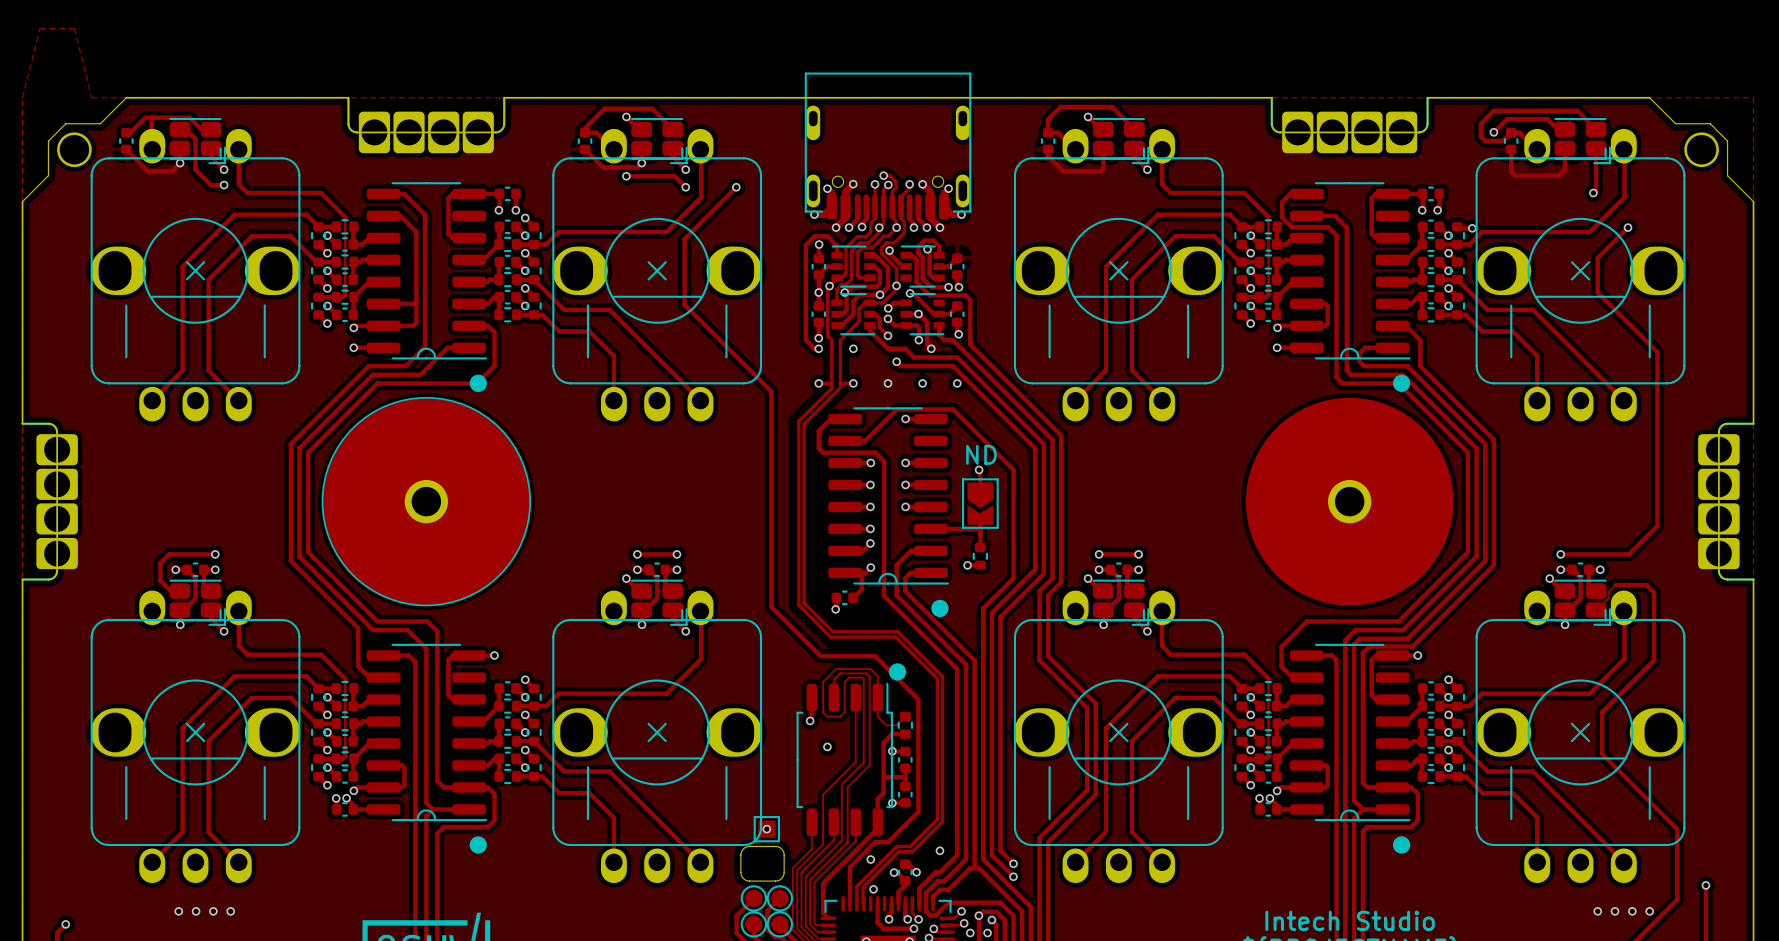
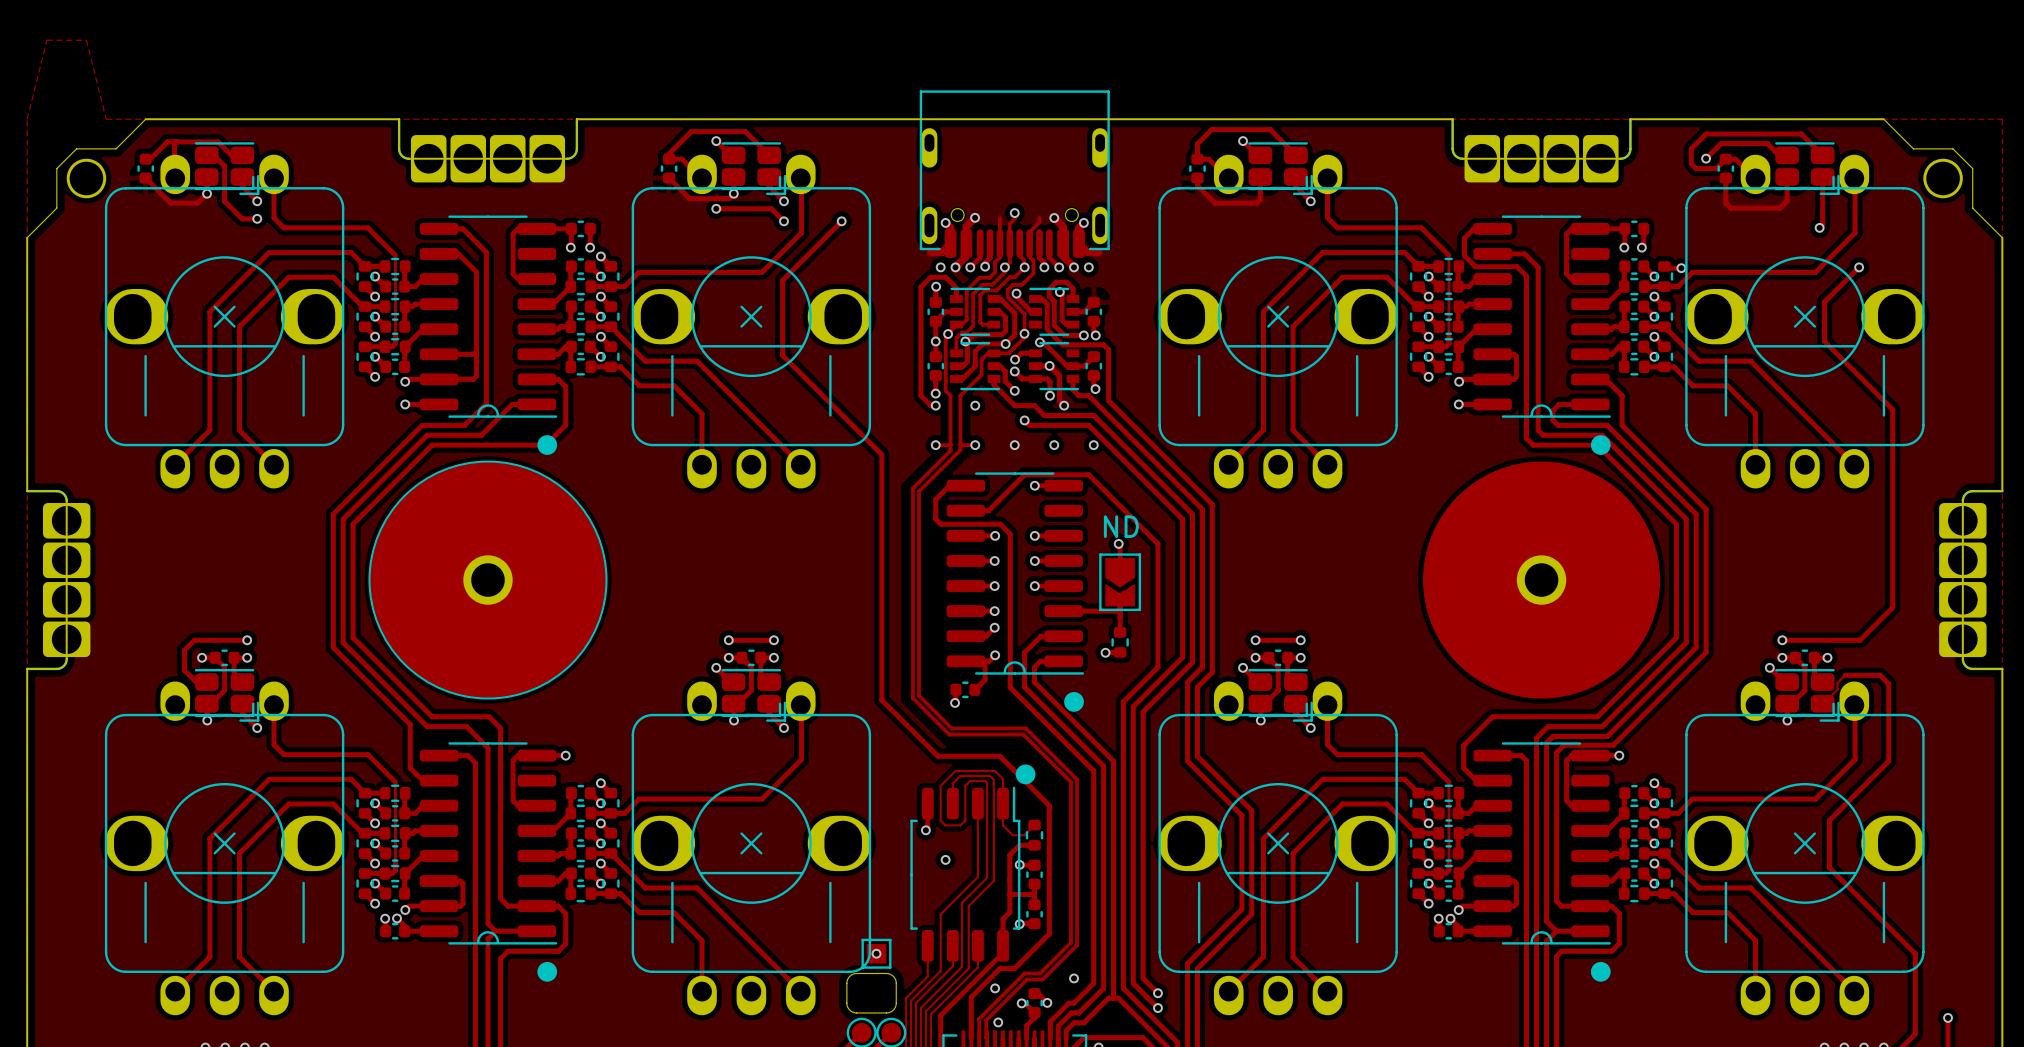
track: (883, 175) (889, 175) (896, 181) (896, 188) (892, 191) (892, 206) -> none
via: (883, 175) -> none
via: none -> (1014, 213)
via: (875, 184) -> none
via: (888, 184) -> none
via: (909, 184) -> none
via position: (814, 214) -> (940, 267)
via position: (961, 214) -> (1088, 267)

